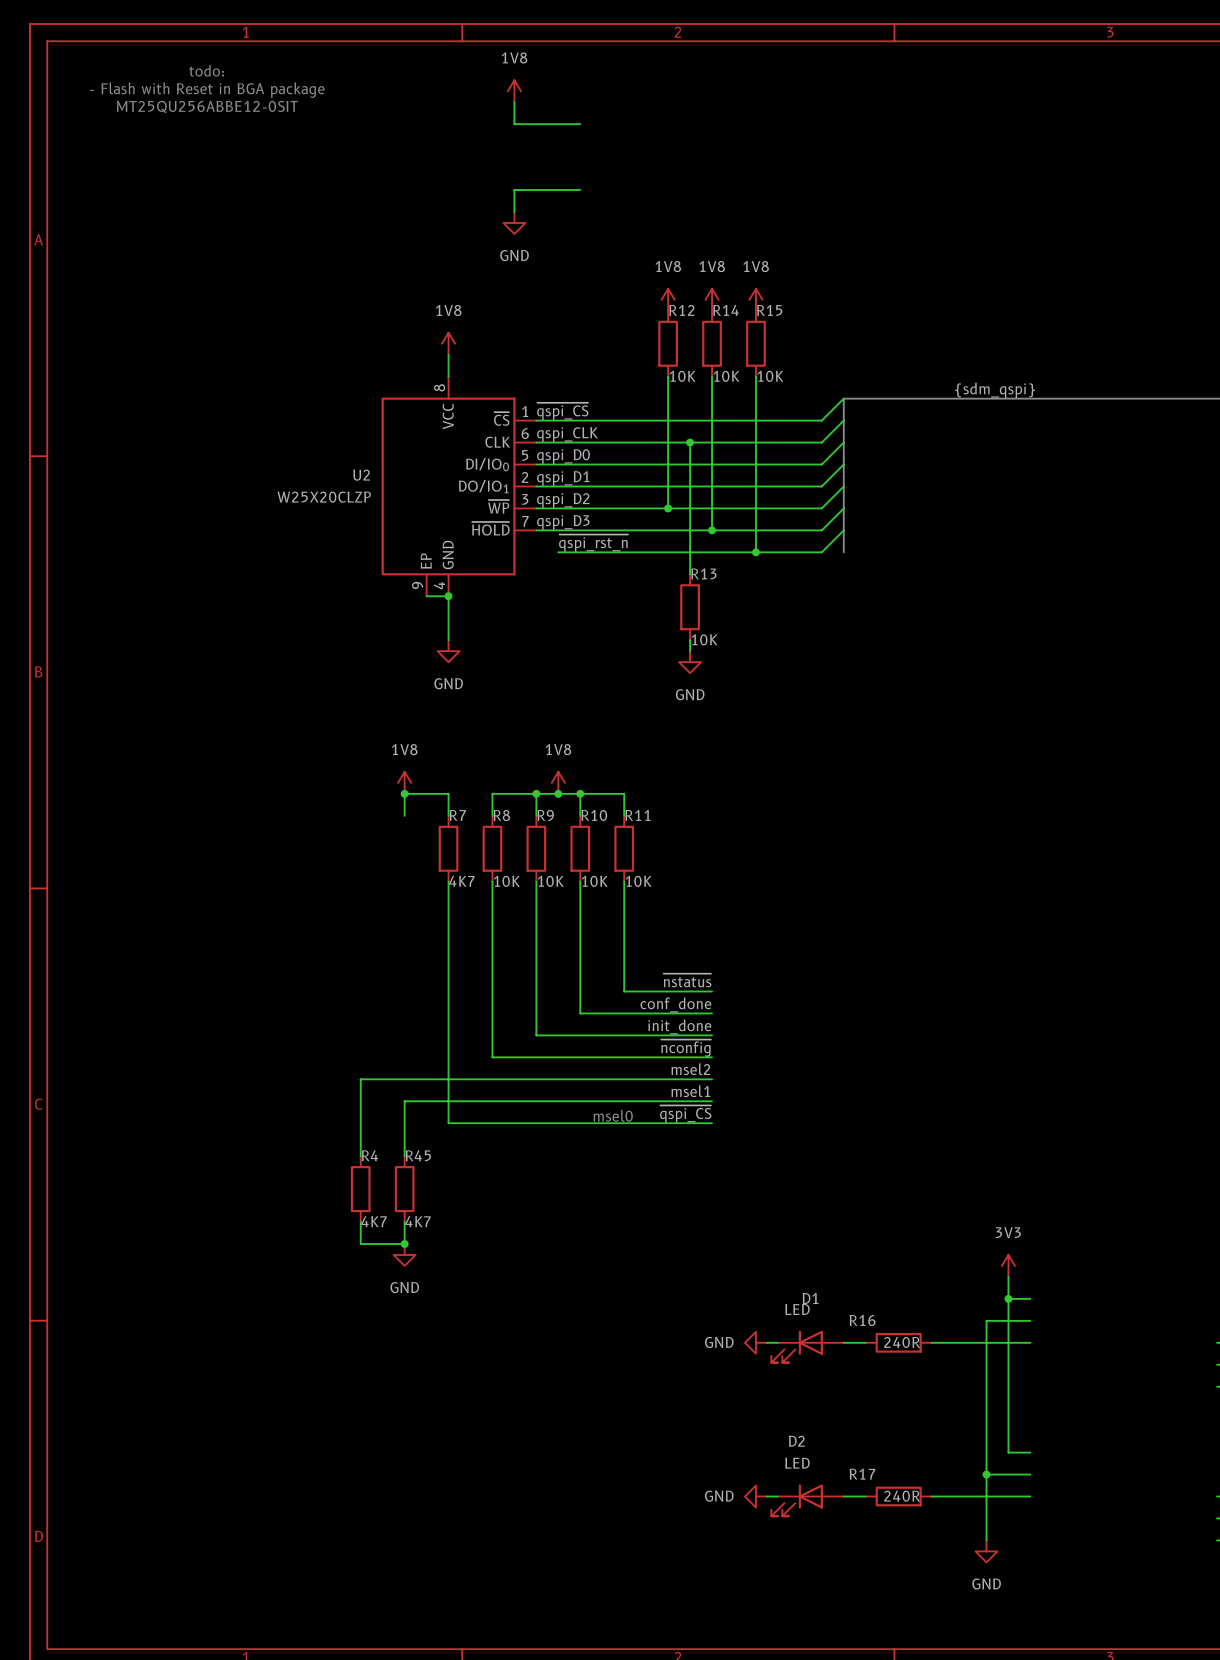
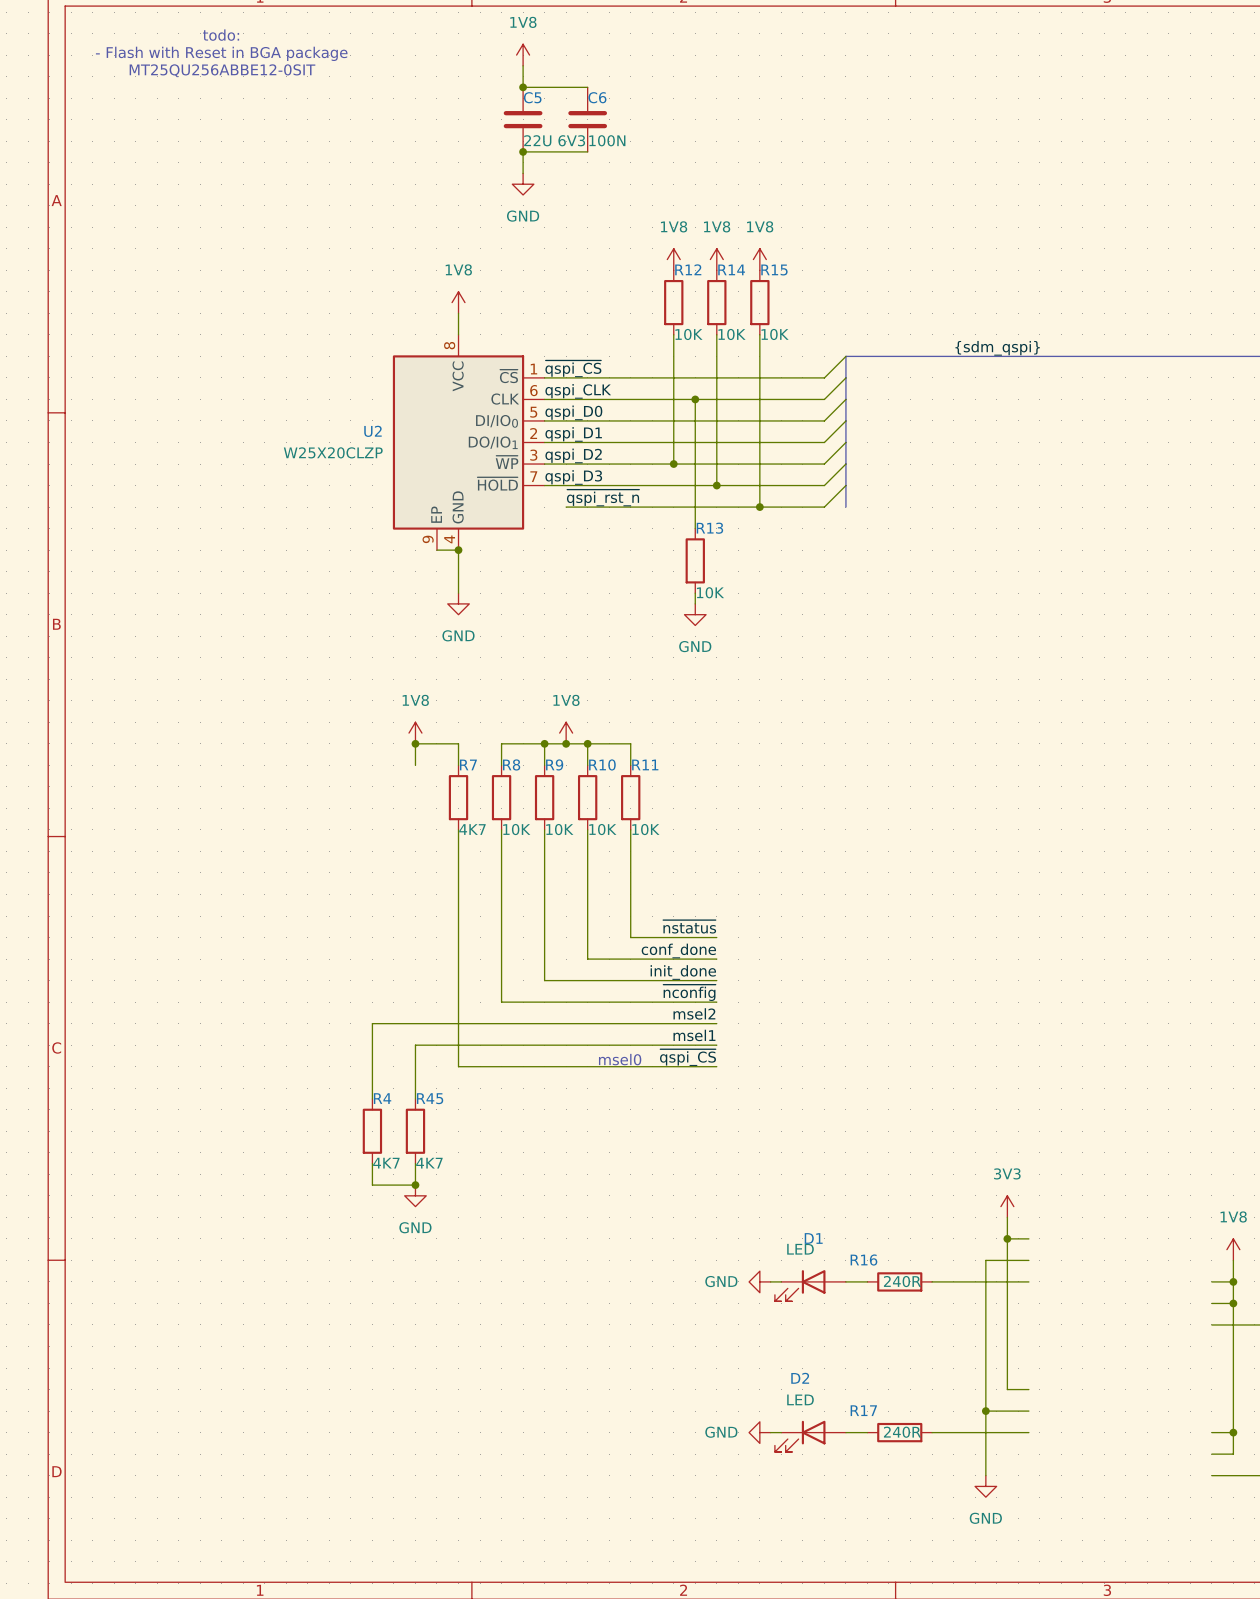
junction: none -> (523, 87)
C5: none -> 22U 6V3 (523, 119)
C6: none -> 100N (587, 119)
junction: none -> (523, 151)

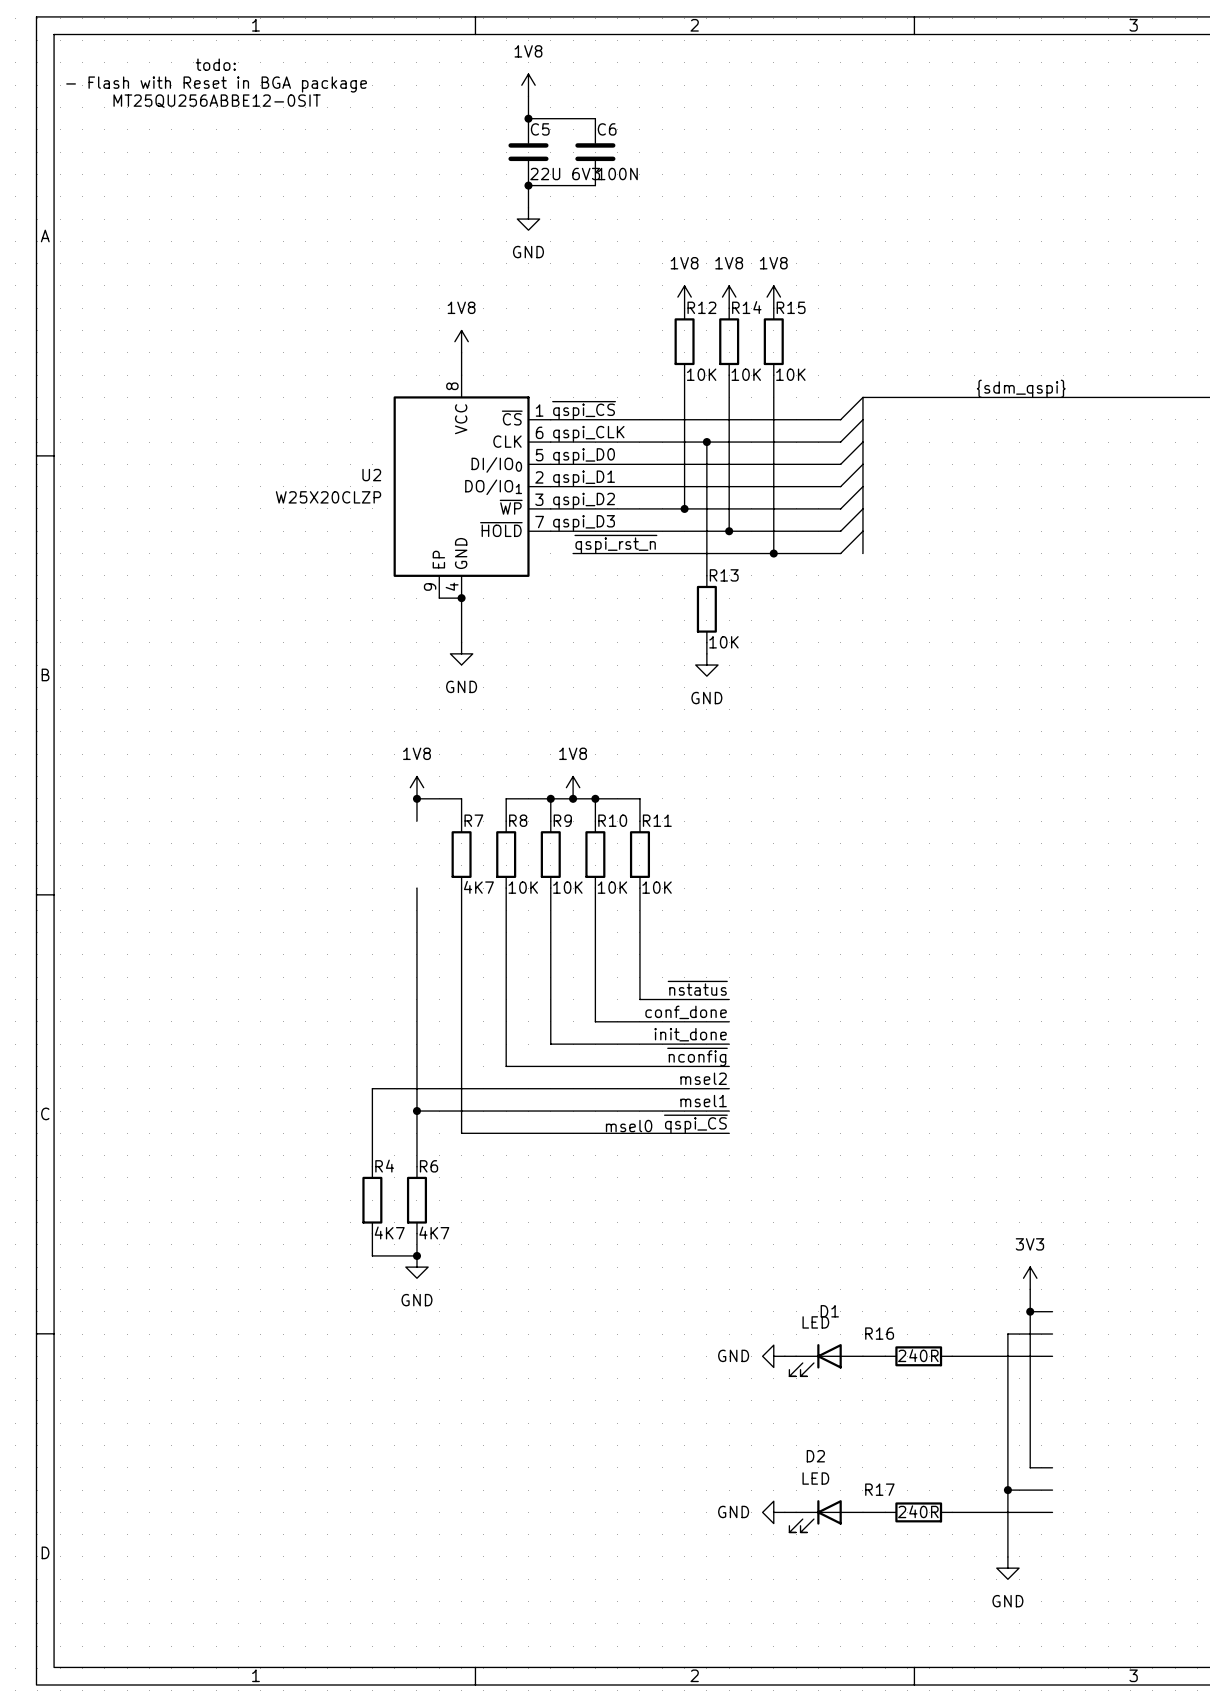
wire: none -> (416, 888) (416, 1111)
junction: none -> (416, 1111)
R45 name: R45 (430, 1098) -> R6 (429, 1166)

